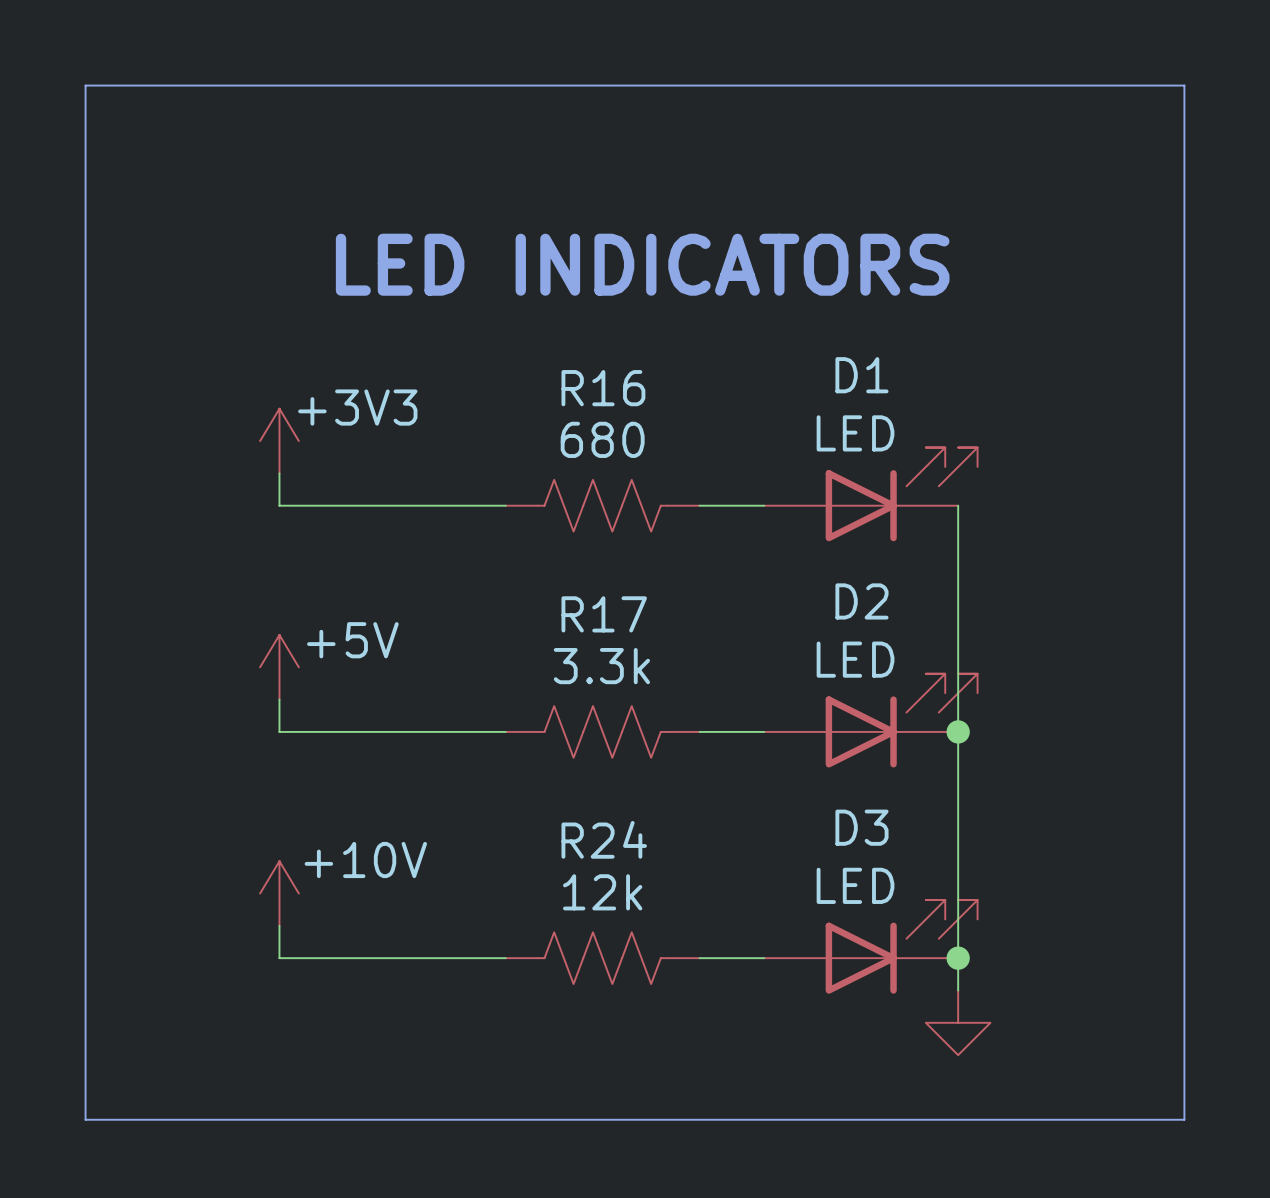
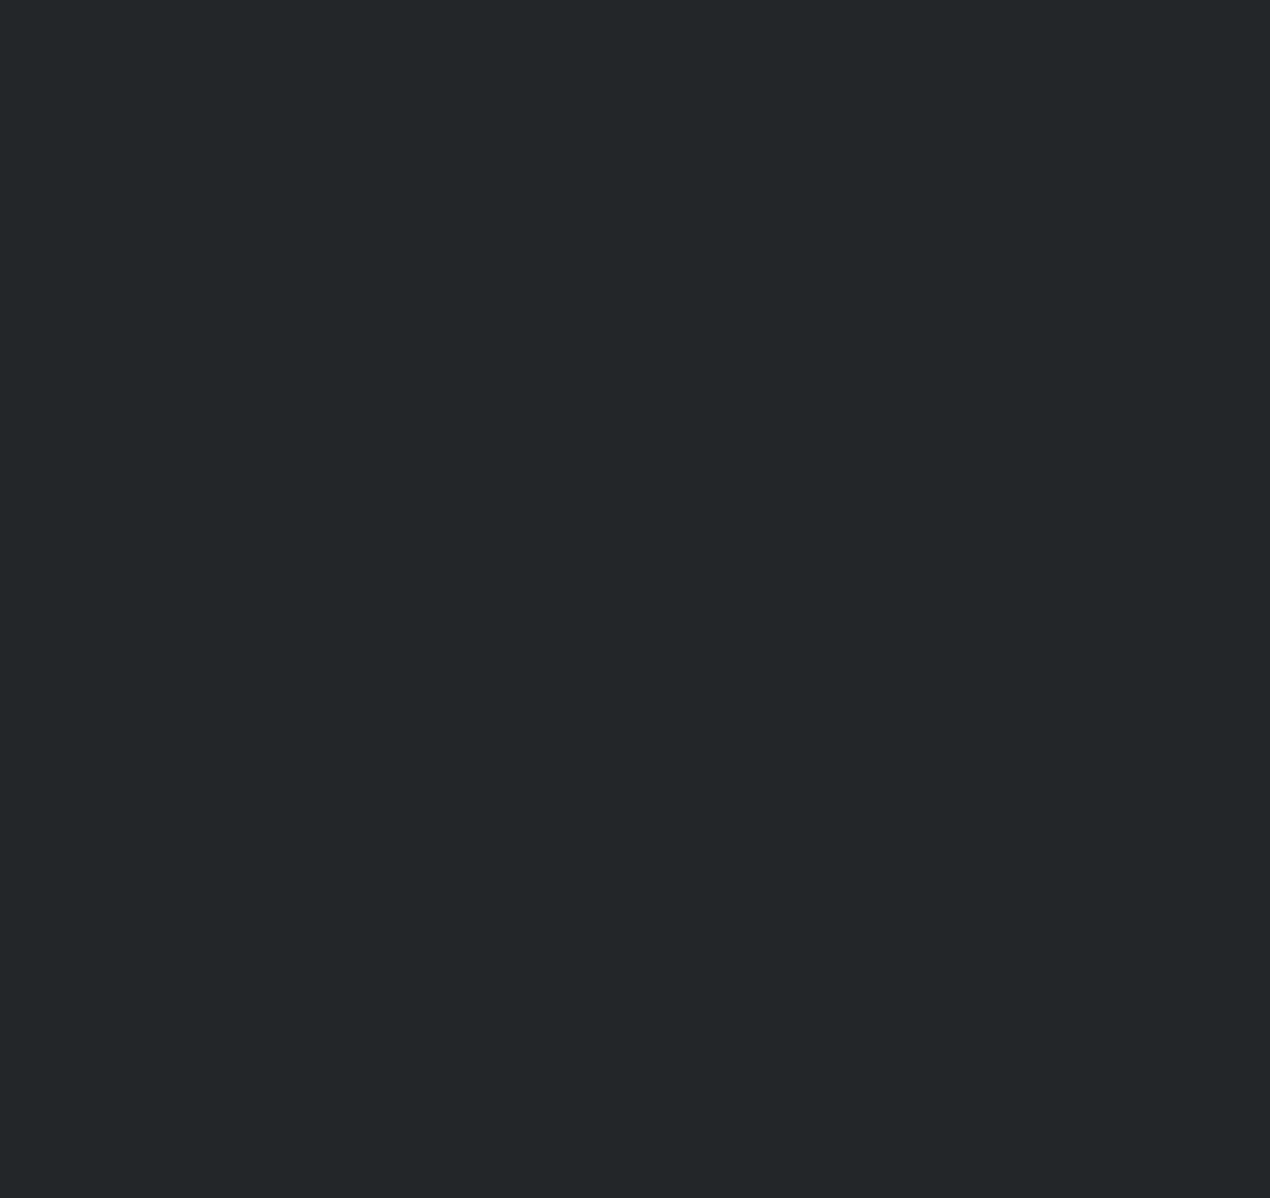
line: (85, 85) (1184, 85) (1184, 1119) (85, 1119) (85, 85) -> none
text: LED INDICATORS (642, 264) -> none
power symbol: +3V3 (279, 441) -> none
wire: (279, 473) (279, 505) (505, 505) -> none
D1: LED (870, 494) -> none
R16: 680 (602, 505) -> none
wire: (699, 505) (764, 505) -> none
wire: (958, 505) (958, 990) -> none
power symbol: +5V (279, 667) -> none
wire: (279, 699) (279, 731) (505, 731) -> none
D2: LED (870, 720) -> none
R17: 3.3k (602, 731) -> none
wire: (699, 731) (764, 731) -> none
junction: (958, 731) -> none
power symbol: +10V (279, 893) -> none
wire: (279, 925) (279, 958) (505, 958) -> none
D3: LED (870, 946) -> none
R24: 12k (602, 958) -> none
wire: (699, 958) (764, 958) -> none
junction: (958, 958) -> none
power symbol: (958, 1022) -> none

